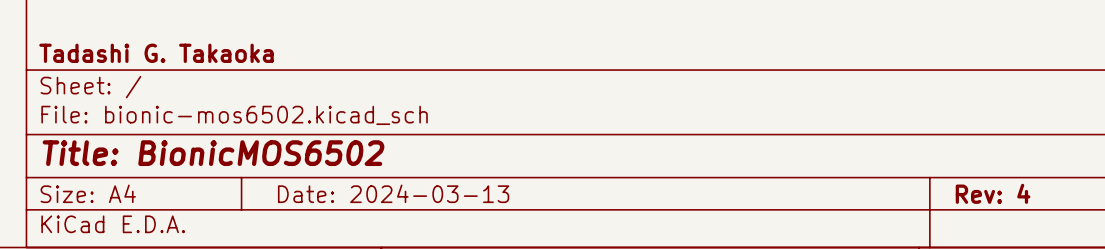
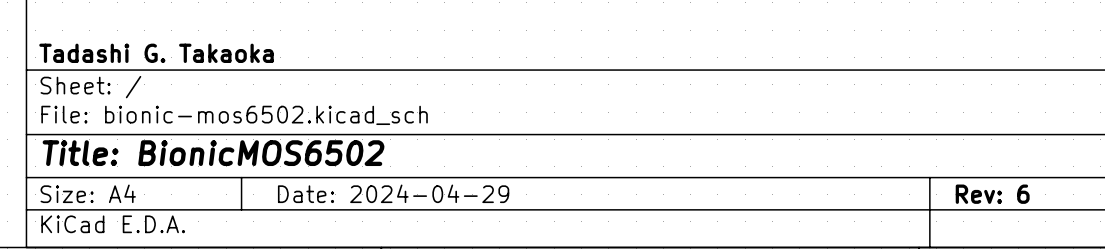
title block: Date: 2024-03-13 (393, 193) -> Date: 2024-04-29 (393, 193)
title block: Rev: 4 (993, 193) -> Rev: 6 (992, 194)

